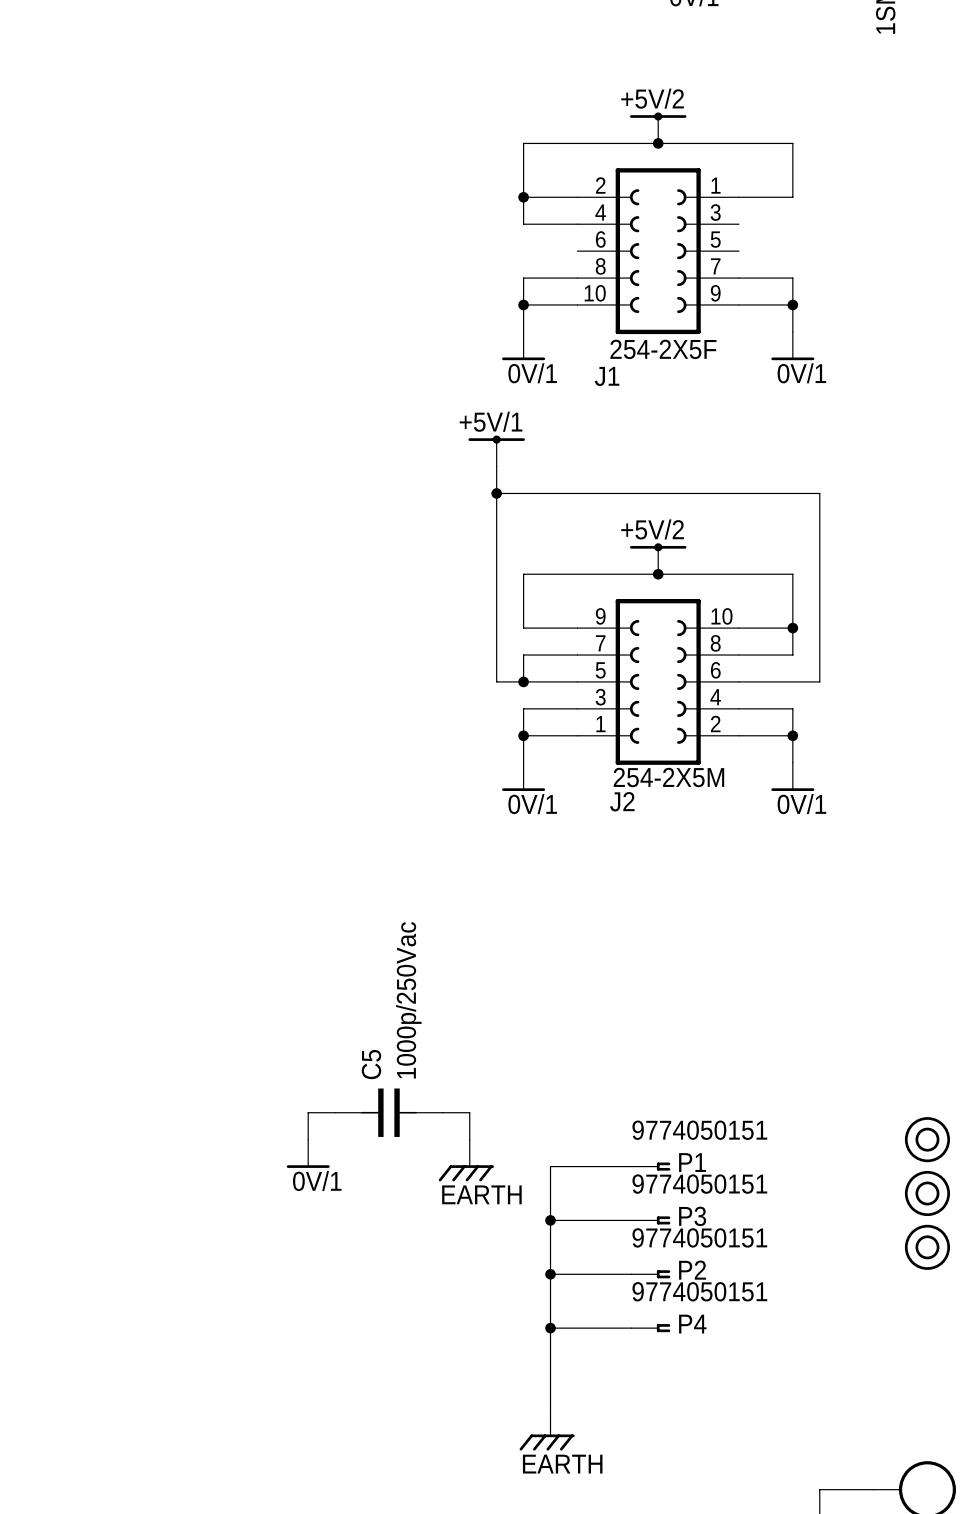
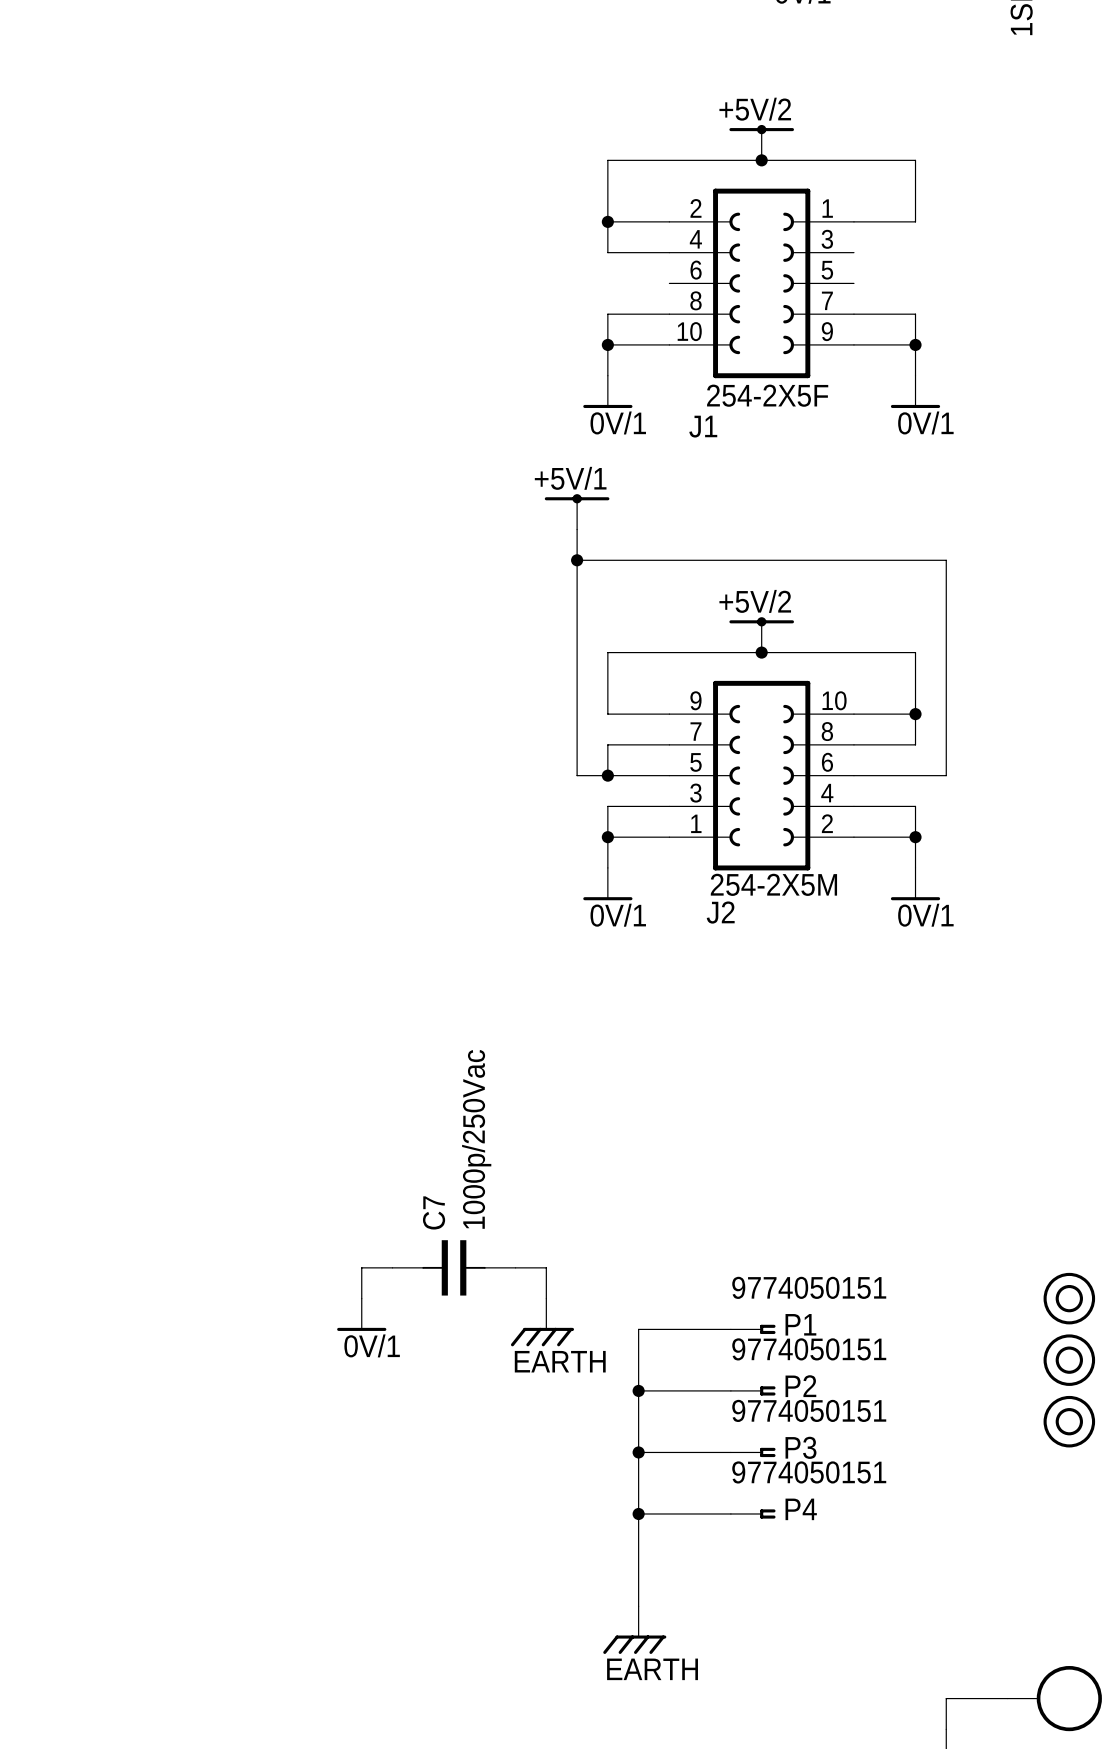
C5 name: C5 (371, 1064) -> C7 (434, 1212)
P3 name: P3 (692, 1216) -> P2 (800, 1386)
P2 name: P2 (692, 1270) -> P3 (800, 1447)

